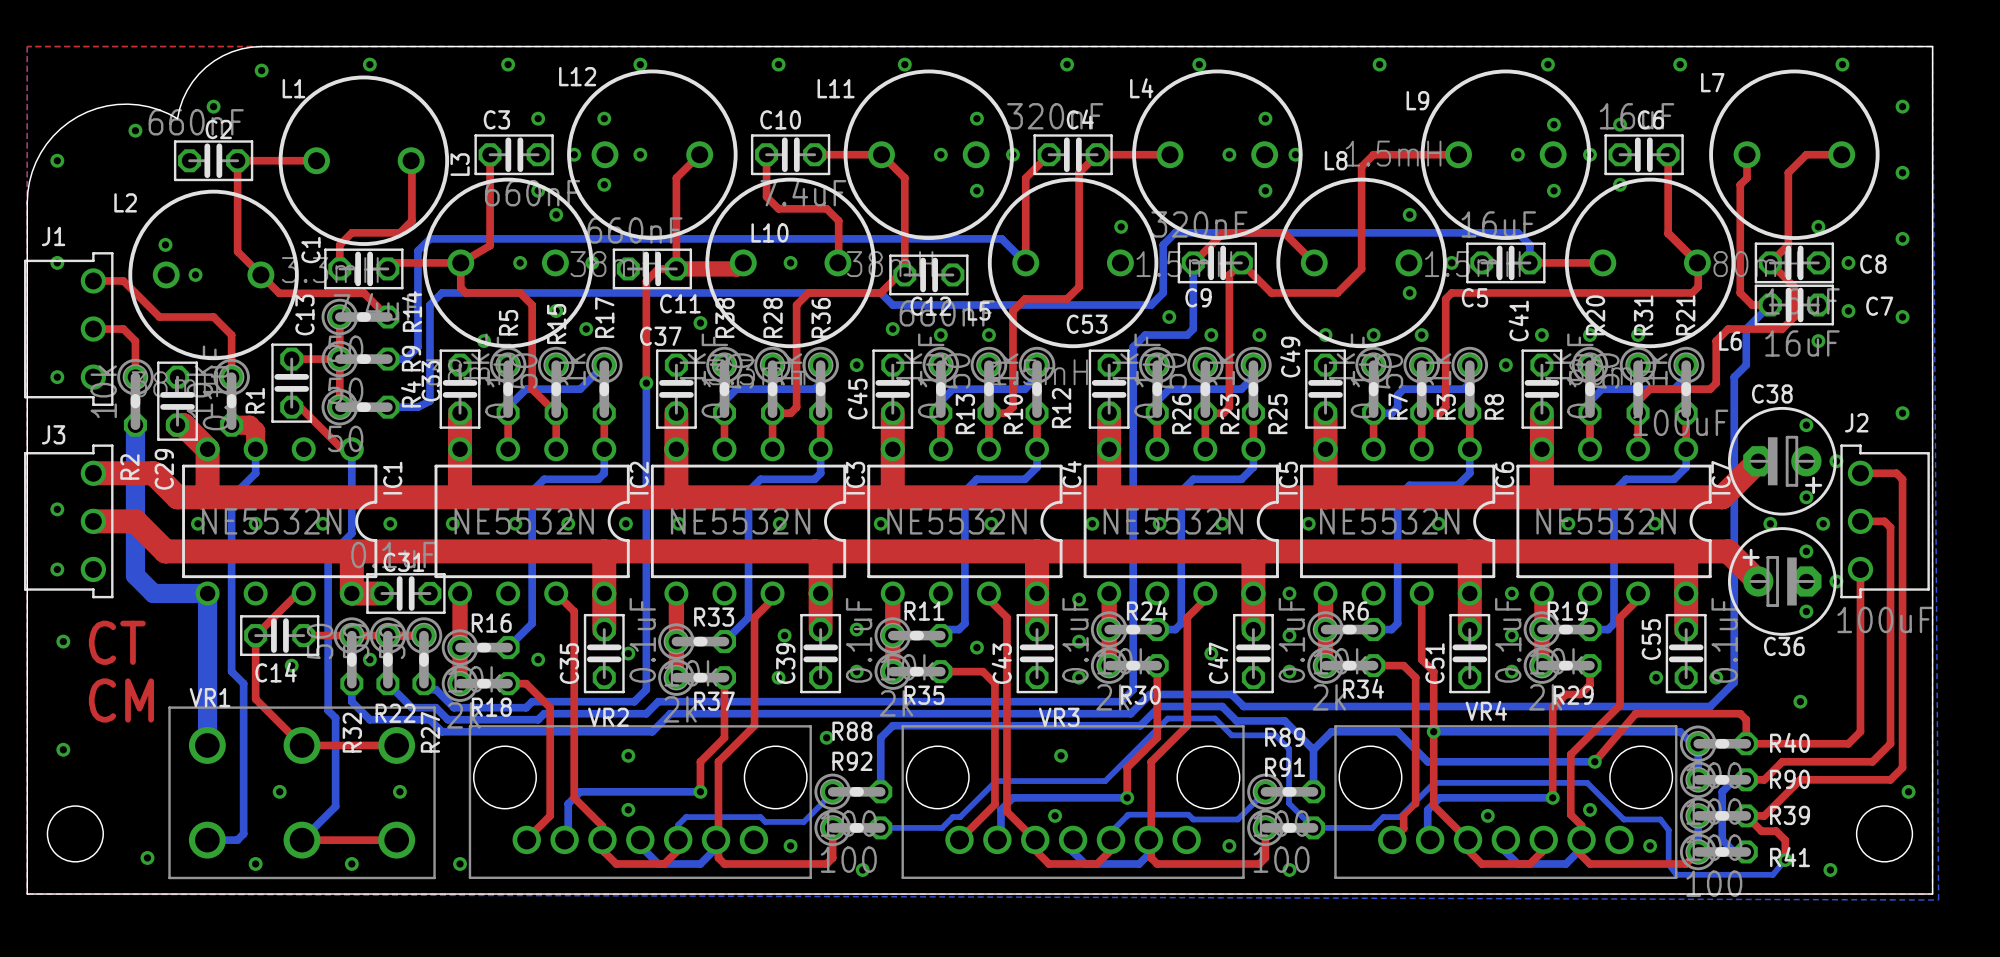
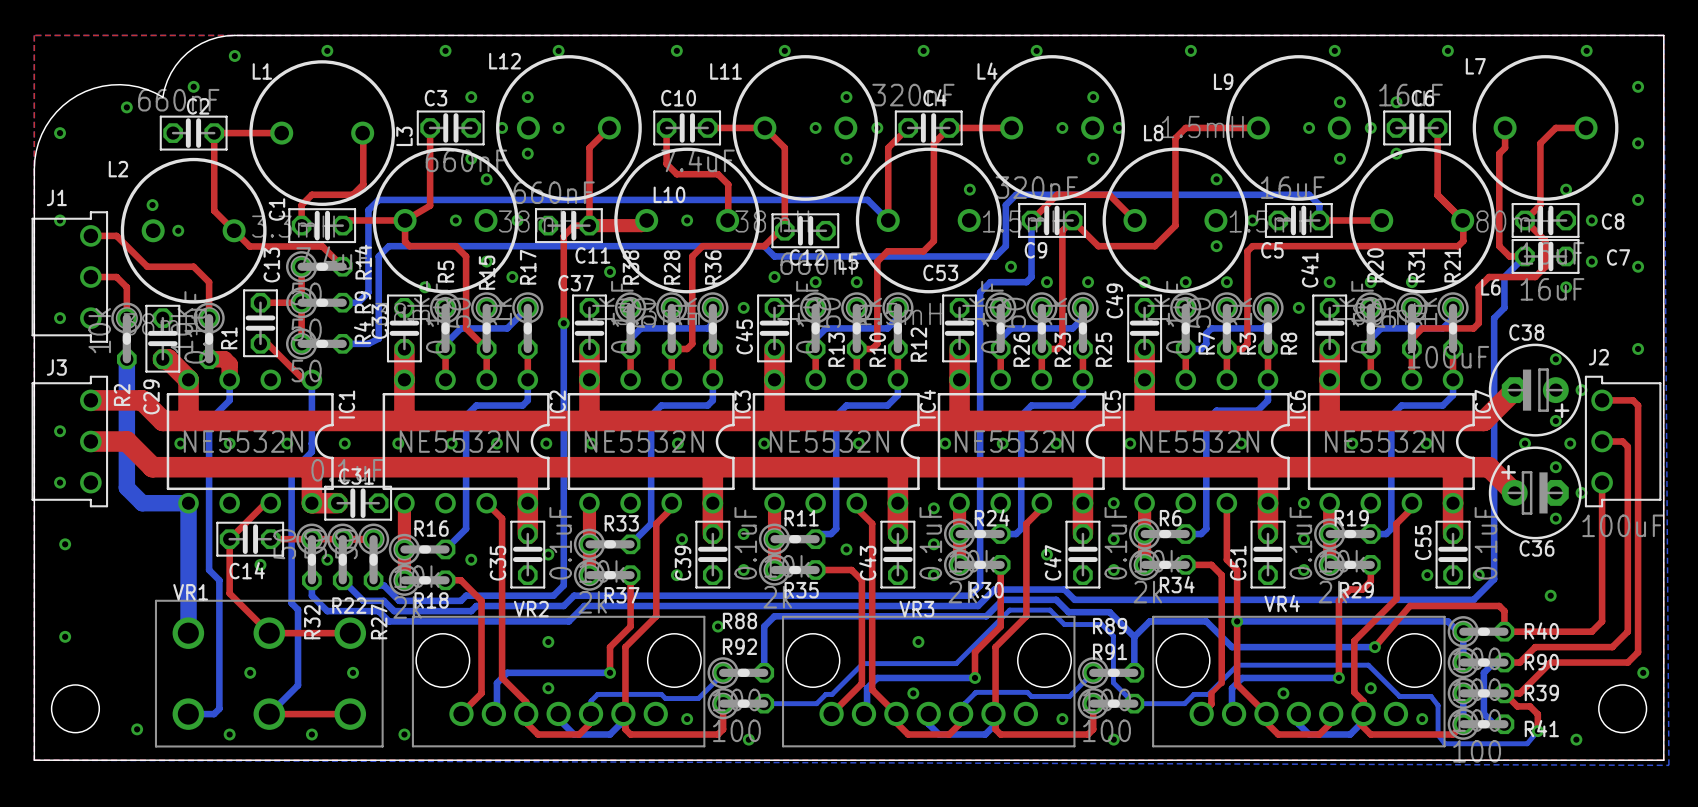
text: CT (117, 642) -> none
text: CM (121, 700) -> none

